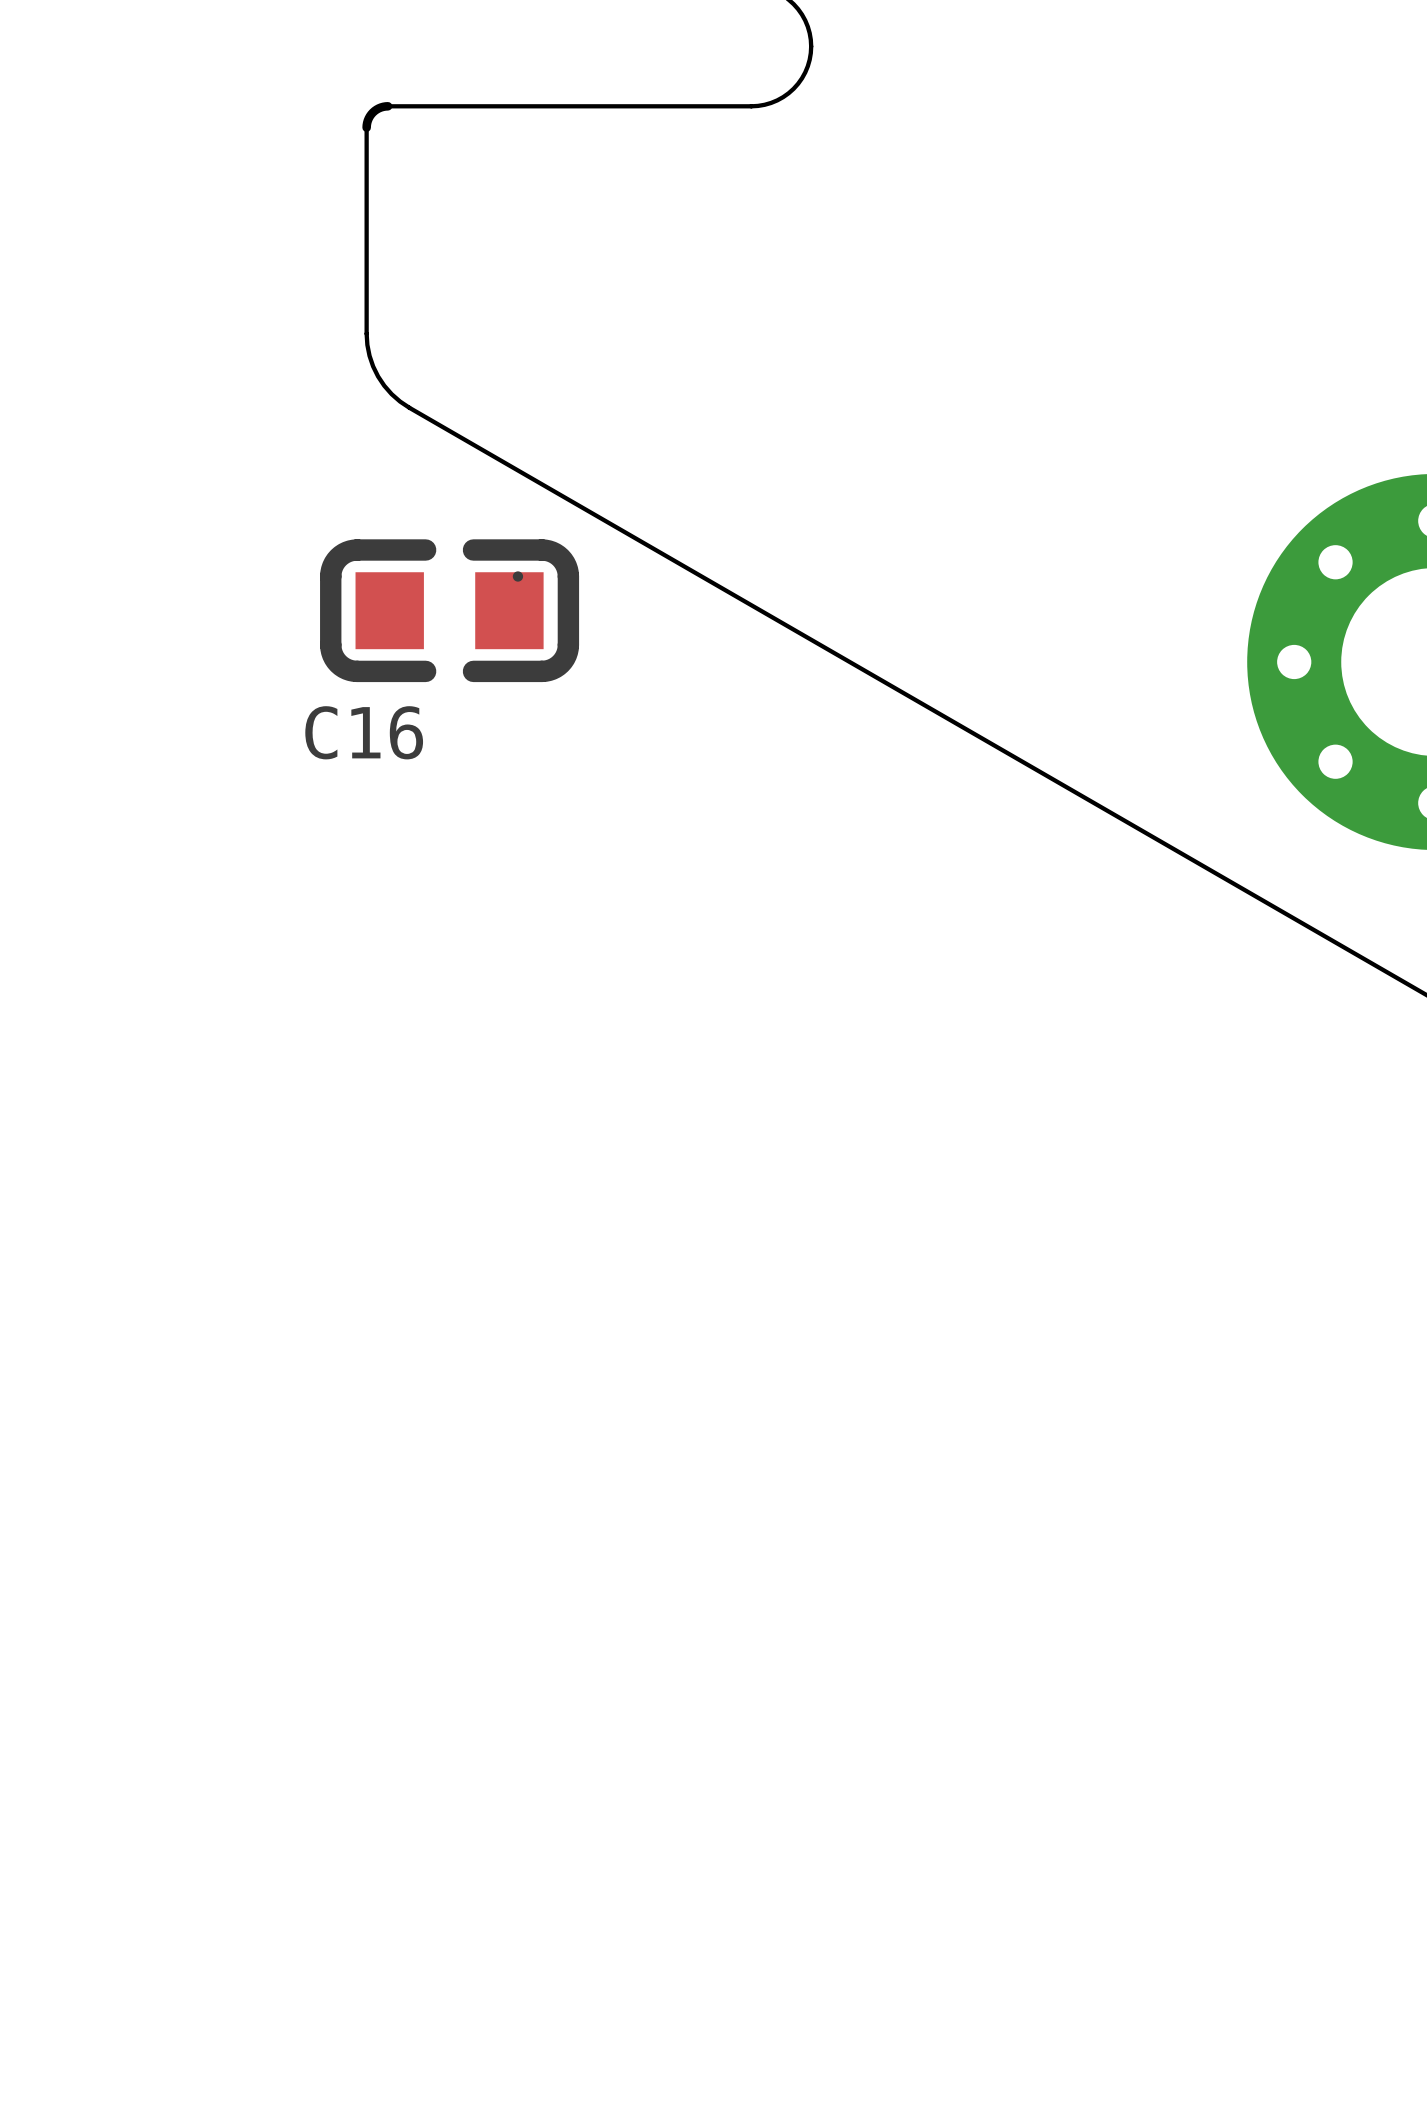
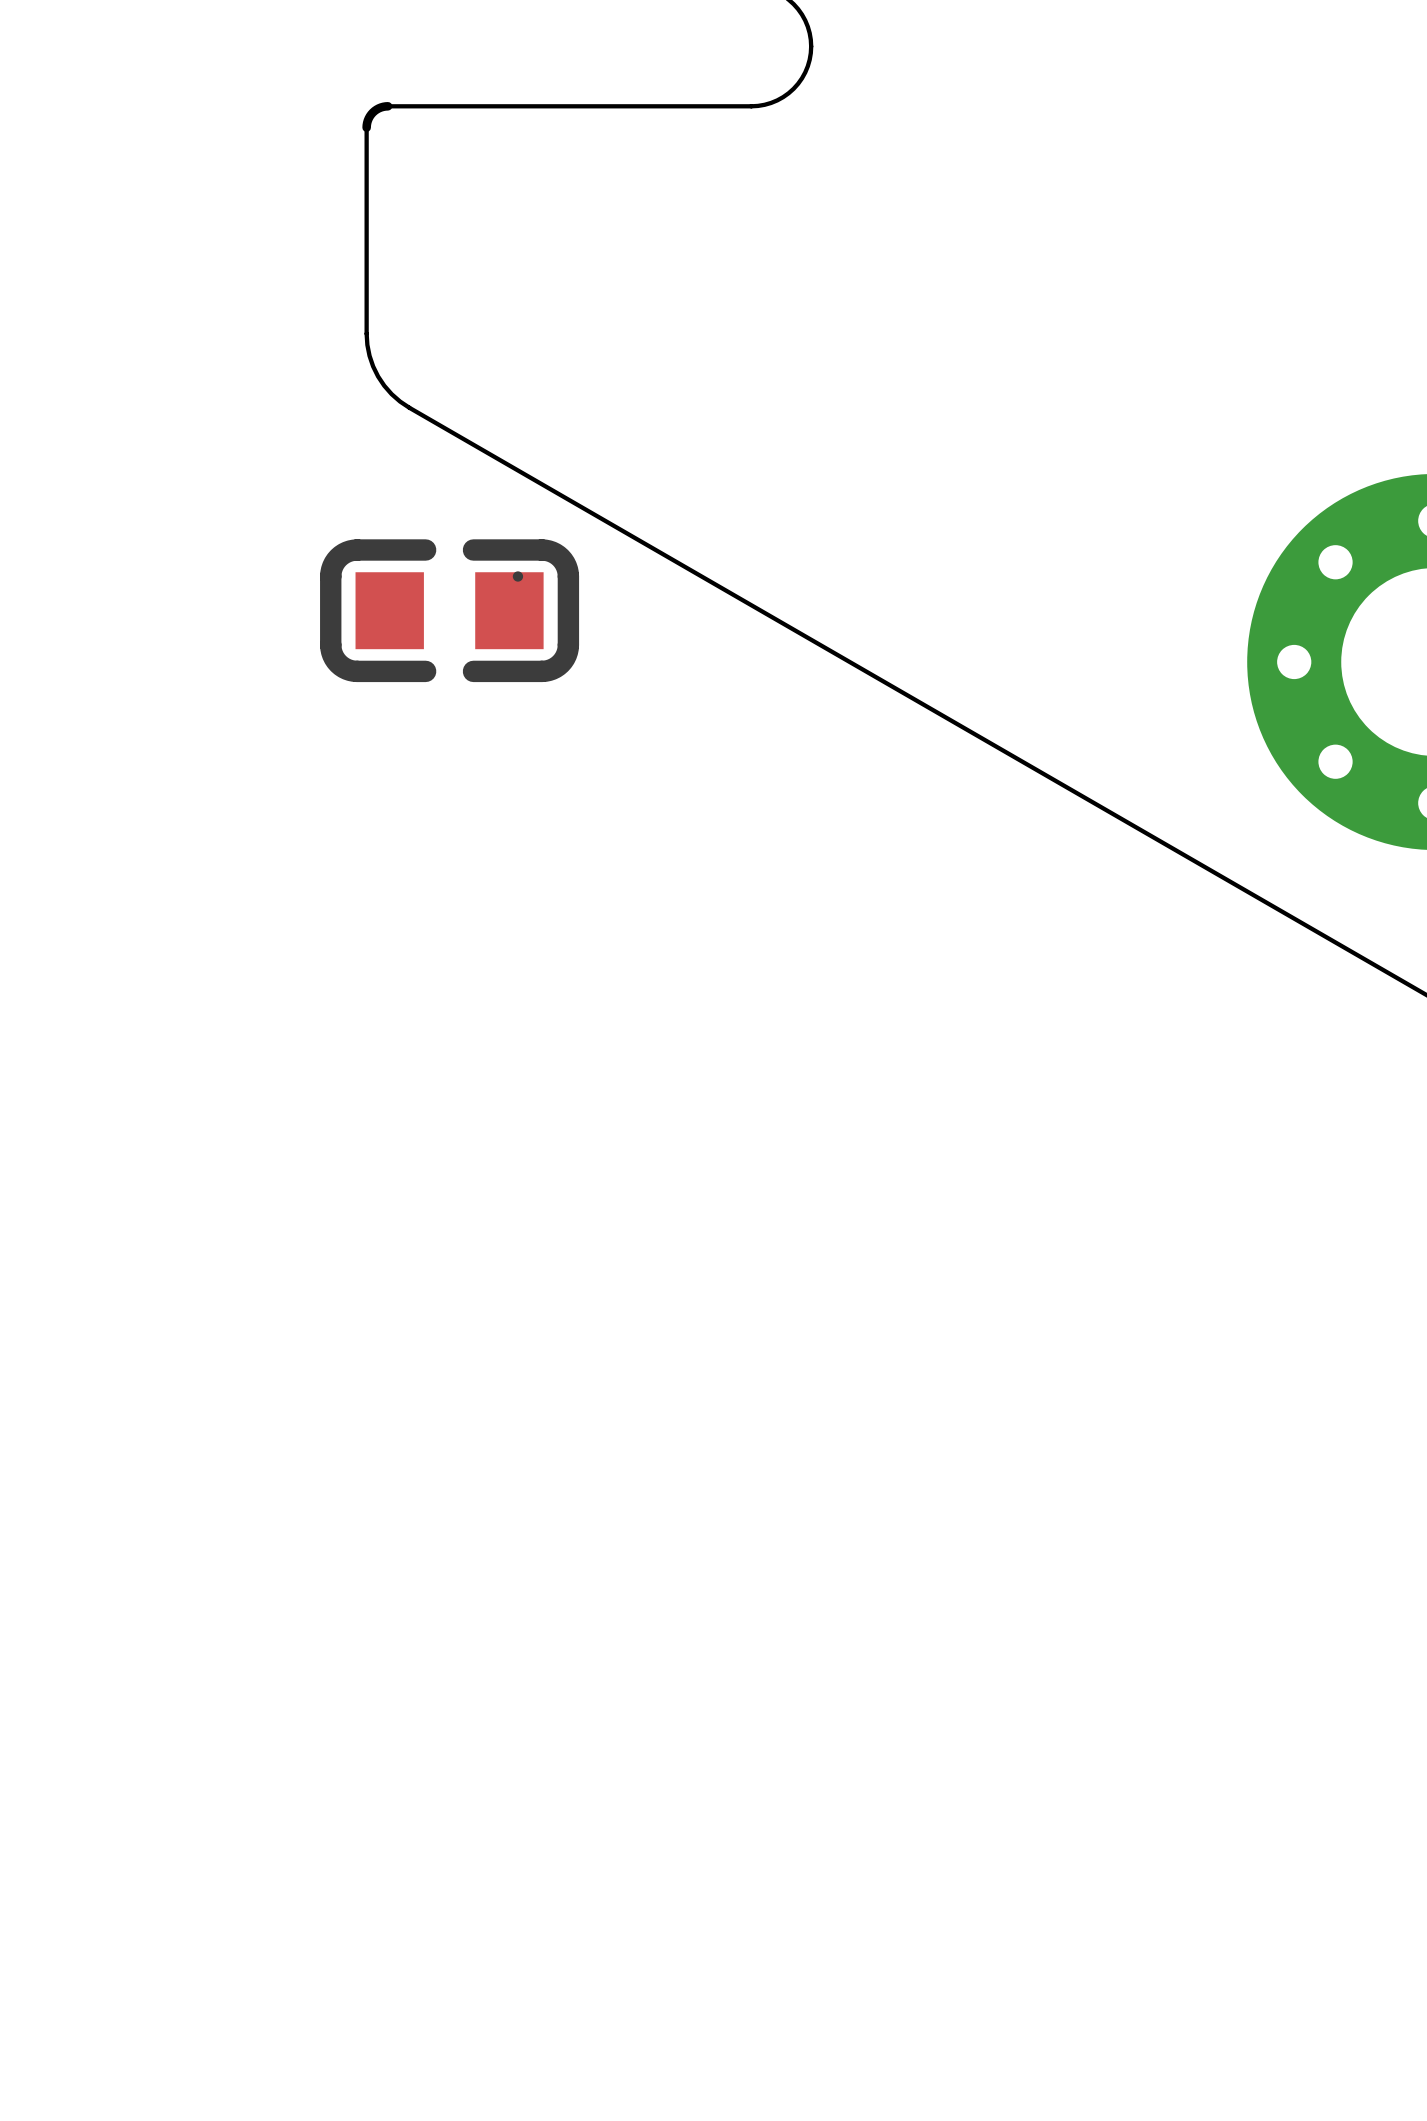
C16 name: C16 (364, 732) -> none

